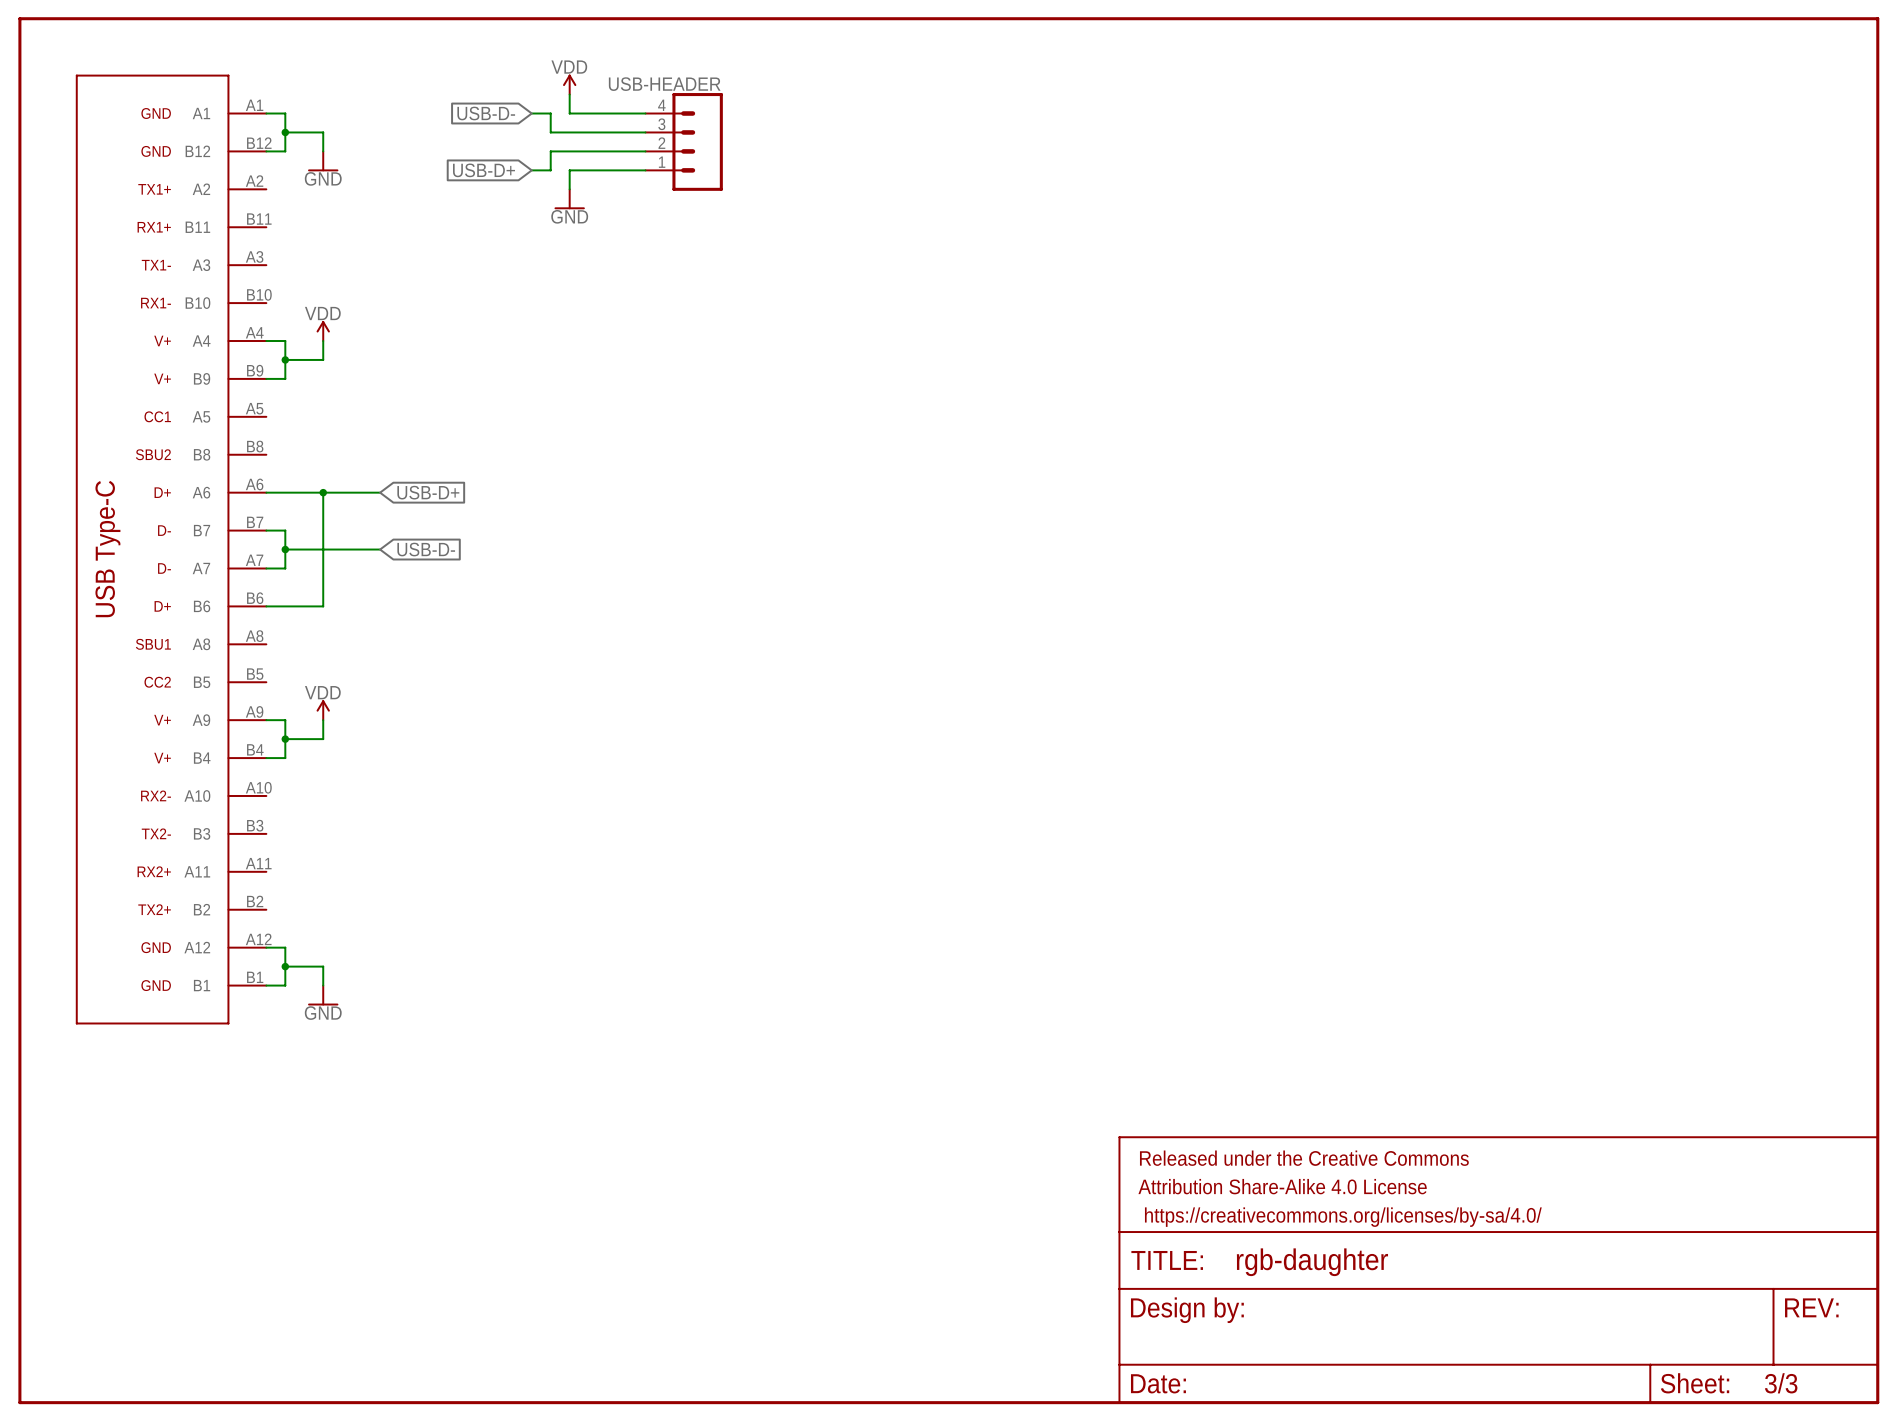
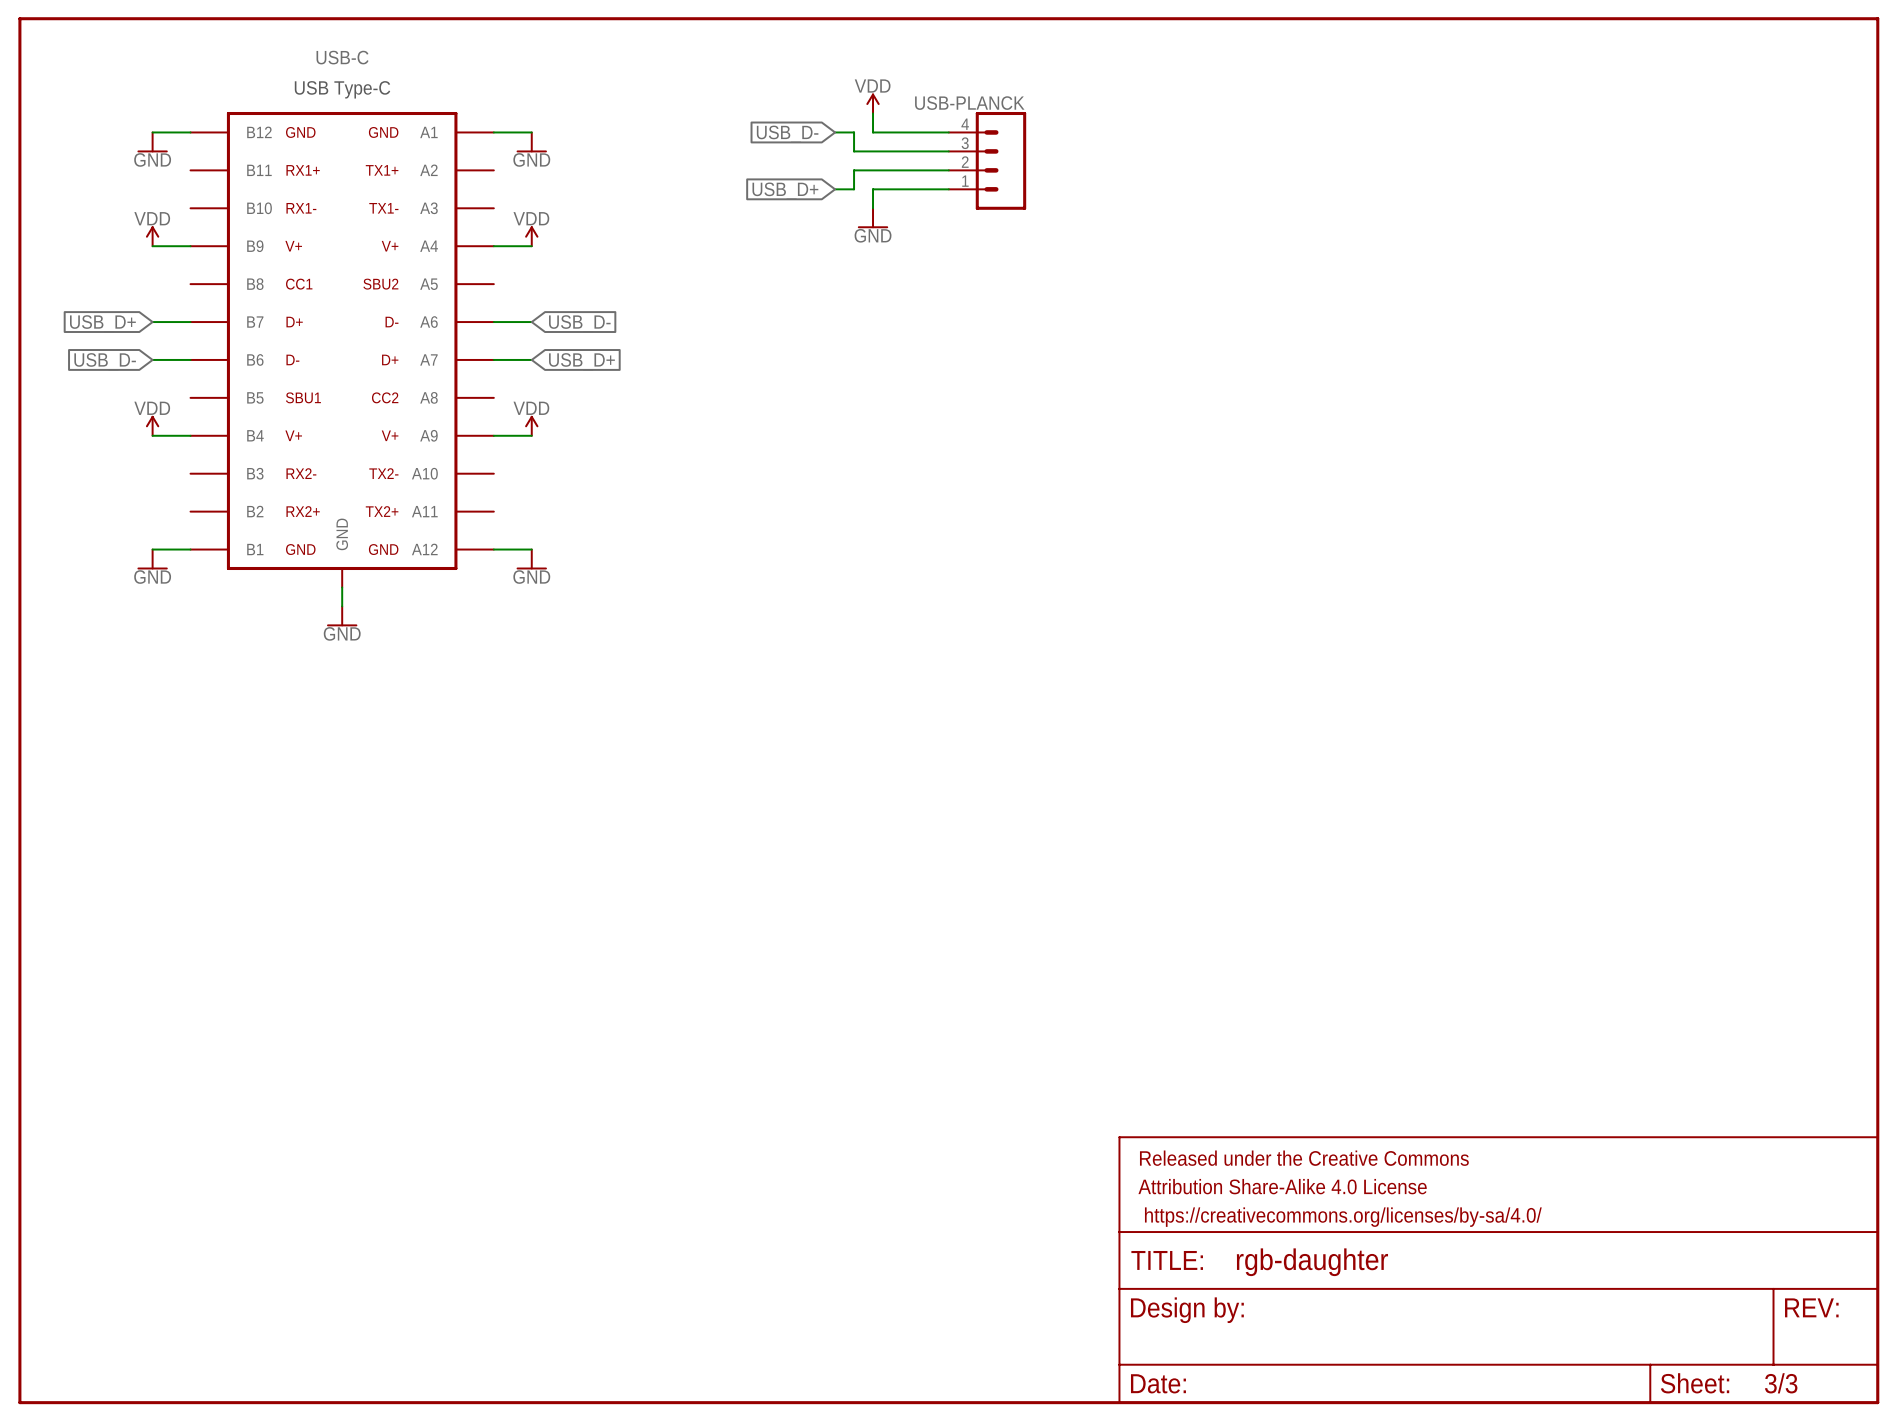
power symbol: VDD (569, 84) -> none
wire: (569, 94) (569, 113) (645, 113) -> none
power symbol: none -> VDD (873, 103)
wire: (266, 113) (285, 113) (285, 151) (266, 151) -> none
global label: USB-D- (486, 113) -> none
wire: (531, 113) (550, 113) (550, 132) (645, 132) -> none
wire: none -> (873, 113) (873, 132) (948, 132)
wire: none -> (152, 132) (190, 132)
wire: (285, 132) (323, 132) (323, 151) -> none
junction: (285, 132) -> none
wire: none -> (493, 132) (531, 132)
wire: none -> (835, 132) (854, 132) (854, 151) (948, 151)
global label: none -> USB_D- (787, 134)
USB-HEADER: (684, 141) -> none
power symbol: none -> GND (152, 142)
wire: (645, 151) (550, 151) (550, 170) (531, 170) -> none
USB-PLANCK: none -> (987, 160)
power symbol: GND (323, 161) -> none
global label: USB-D+ (484, 170) -> none
wire: (645, 170) (569, 170) (569, 189) -> none
wire: none -> (948, 170) (854, 170) (854, 189) (835, 189)
wire: none -> (948, 189) (873, 189) (873, 208)
global label: none -> USB_D+ (785, 191)
power symbol position: GND (569, 199) -> GND (531, 142)
power symbol: none -> GND (873, 218)
power symbol: none -> VDD (152, 236)
power symbol: none -> VDD (531, 236)
wire: none -> (152, 246) (190, 246)
wire: none -> (493, 246) (531, 246)
wire: none -> (152, 322) (190, 322)
wire: none -> (493, 322) (531, 322)
global label: none -> USB_D+ (102, 323)
global label: none -> USB_D- (579, 323)
power symbol: VDD (323, 331) -> none
wire: (266, 341) (285, 341) (285, 378) (266, 378) -> none
wire: (323, 341) (323, 359) (285, 359) -> none
USB-C: none -> (342, 349)
wire: none -> (152, 359) (190, 359)
junction: (285, 359) -> none
wire: none -> (493, 359) (531, 359)
global label: none -> USB_D- (105, 361)
global label: none -> USB_D+ (581, 361)
power symbol: none -> VDD (152, 425)
power symbol: none -> VDD (531, 425)
wire: none -> (152, 435) (190, 435)
wire: none -> (493, 435) (531, 435)
wire: (266, 492) (380, 492) -> none
wire: (323, 492) (323, 606) (266, 606) -> none
junction: (323, 492) -> none
global label: USB-D+ (428, 492) -> none
wire: (266, 530) (285, 530) (285, 568) (266, 568) -> none
wire: none -> (152, 549) (190, 549)
part: (171, 549) -> none
wire: (285, 549) (380, 549) -> none
junction: (285, 549) -> none
global label: USB-D- (426, 549) -> none
wire: none -> (493, 549) (531, 549)
power symbol: none -> GND (152, 559)
power symbol: none -> GND (531, 559)
wire: none -> (342, 587) (342, 606)
power symbol: none -> GND (342, 616)
power symbol: VDD (323, 710) -> none
wire: (266, 720) (285, 720) (285, 758) (266, 758) -> none
wire: (323, 720) (323, 739) (285, 739) -> none
junction: (285, 739) -> none
wire: (266, 947) (285, 947) (285, 985) (266, 985) -> none
wire: (285, 966) (323, 966) (323, 985) -> none
junction: (285, 966) -> none
power symbol: GND (323, 995) -> none

